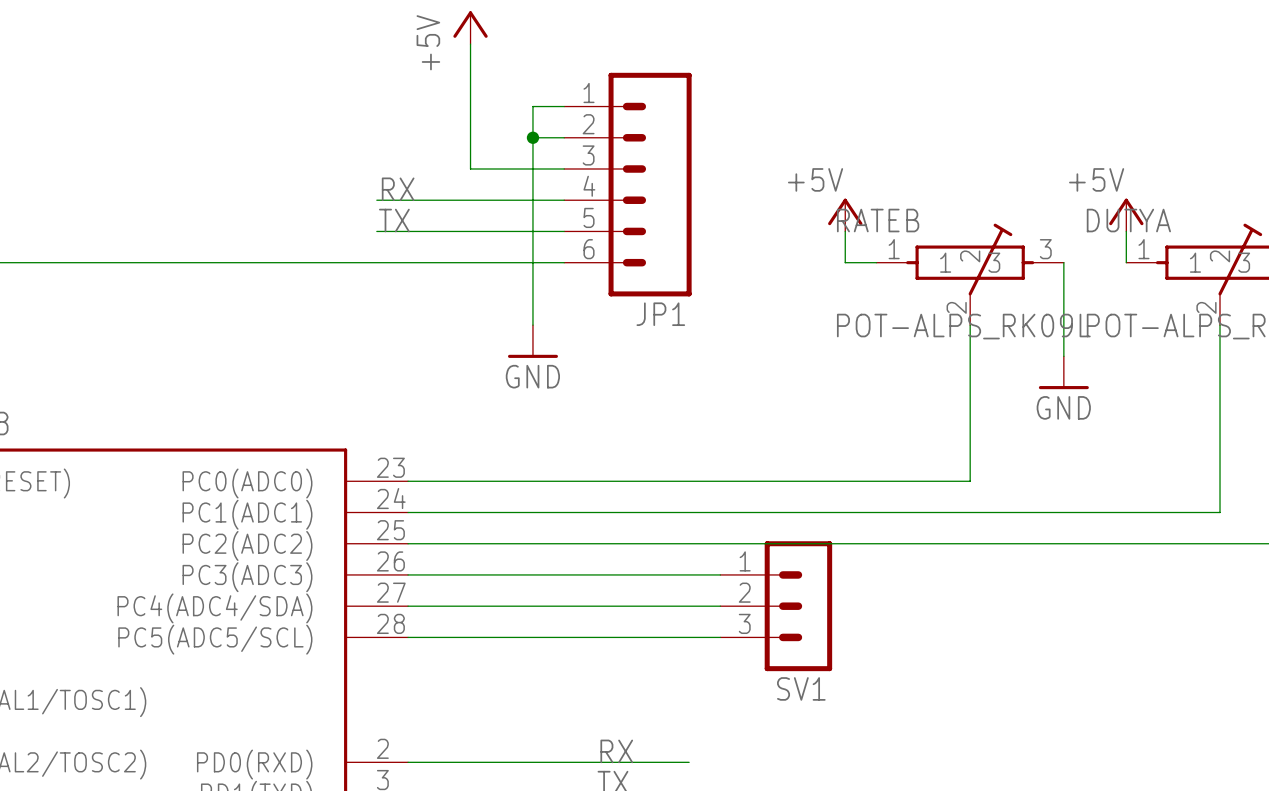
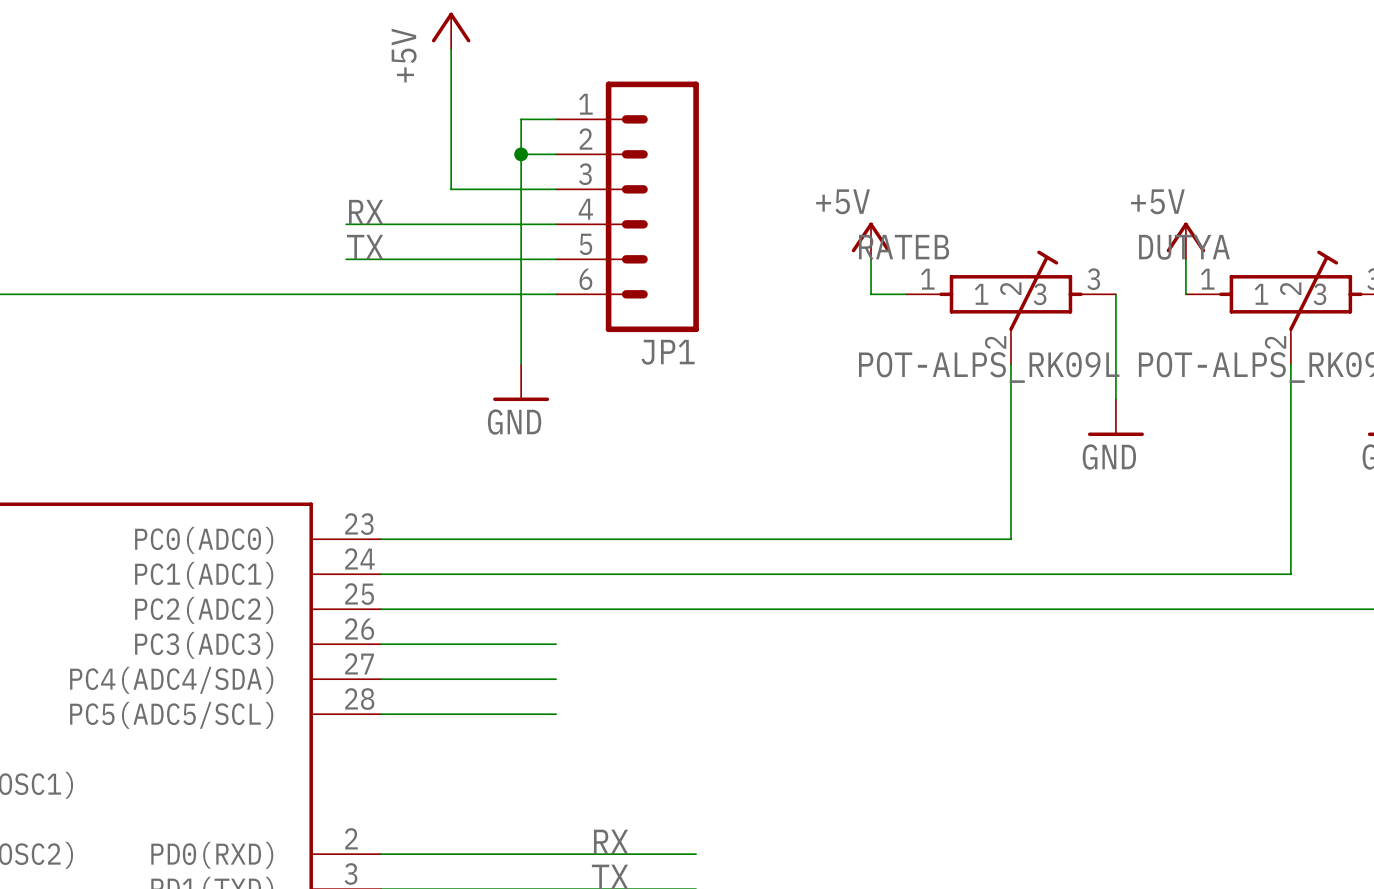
wire: (564, 574) (720, 574) -> none
wire: (564, 606) (720, 606) -> none
SV1: (776, 606) -> none
wire: (564, 637) (720, 637) -> none

